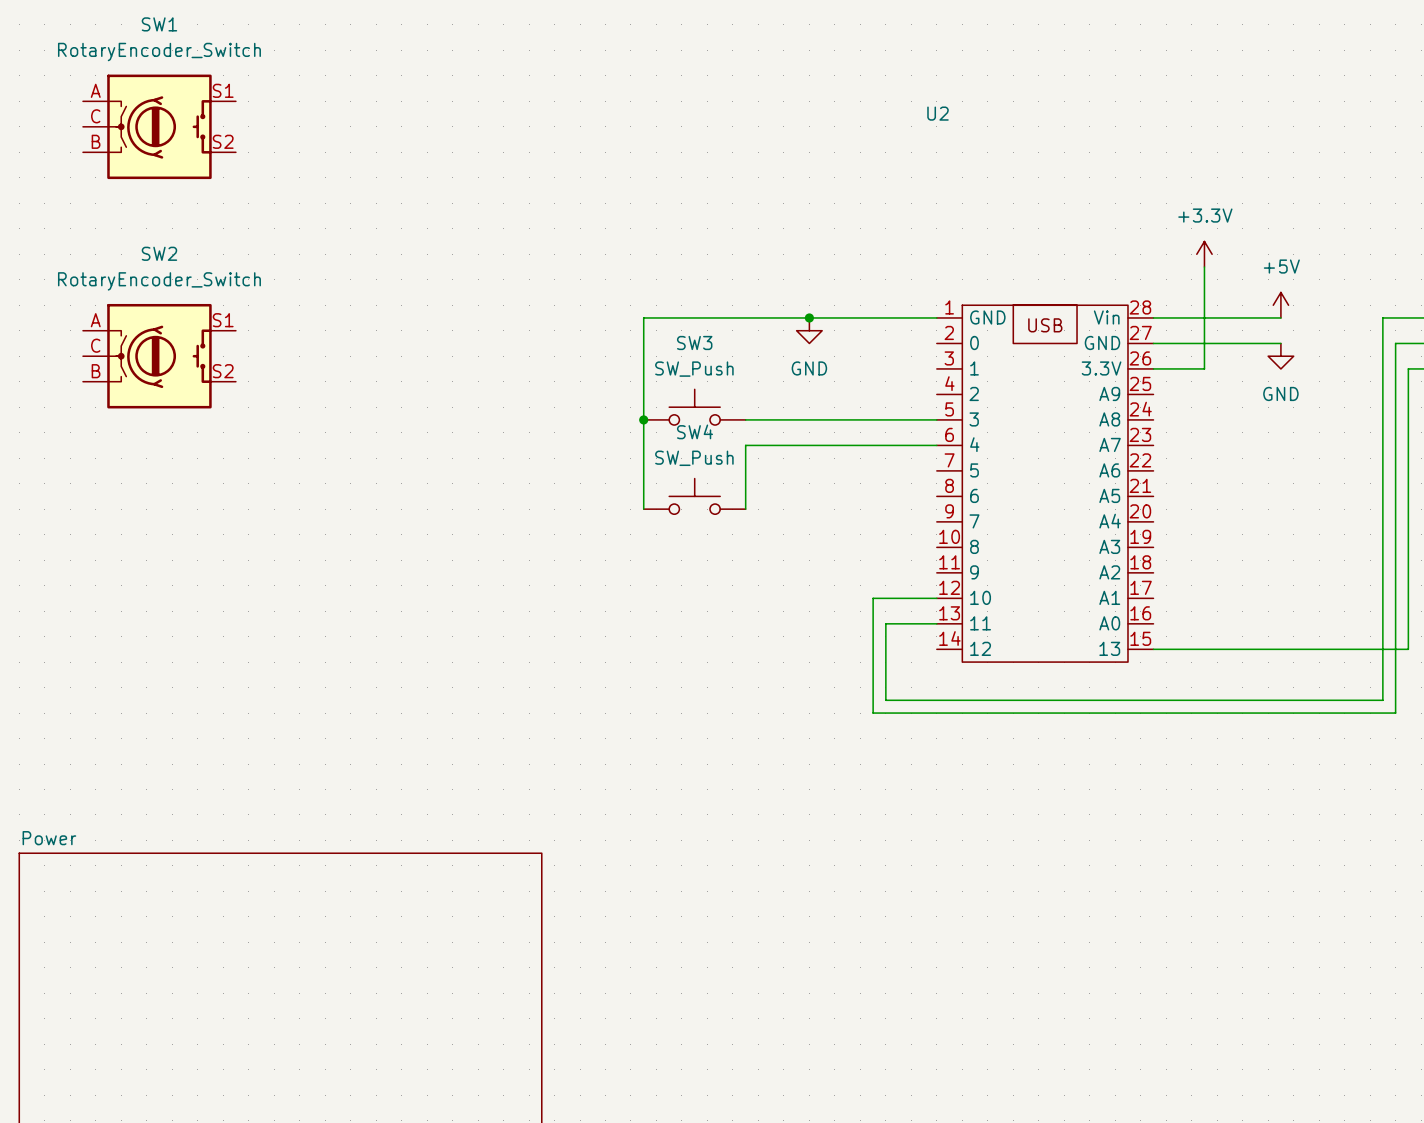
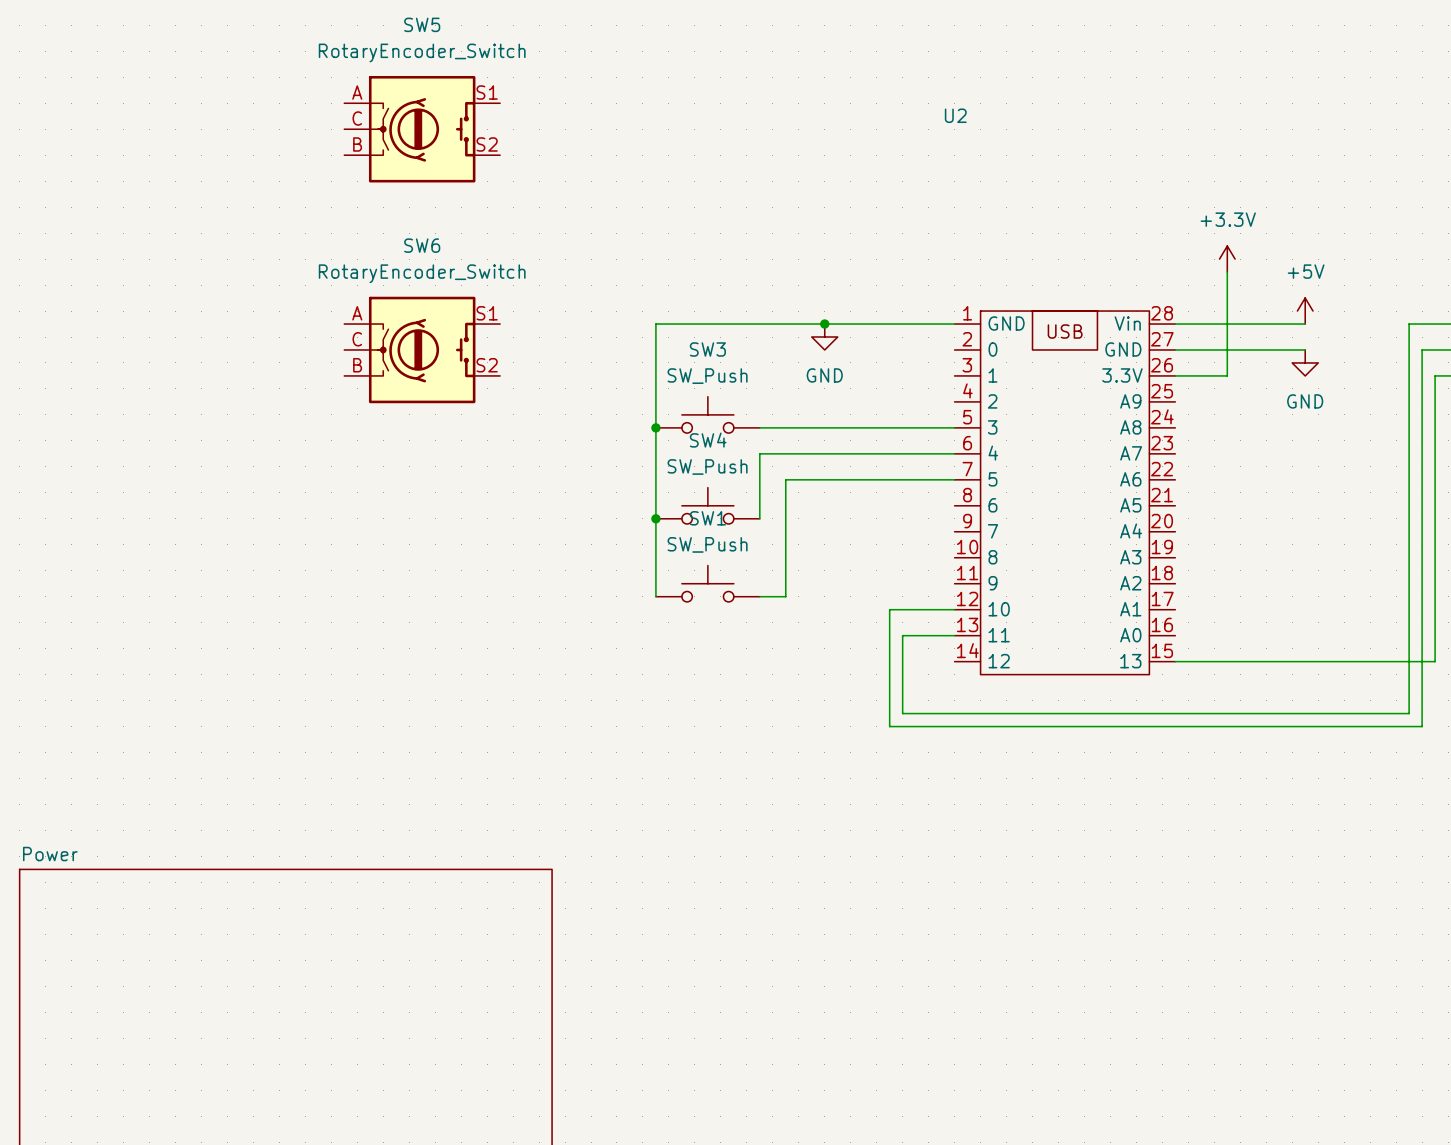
SW1 name position: SW1 (159, 24) -> SW1 (707, 518)
SW1 value: RotaryEncoder_Switch (159, 52) -> SW_Push (707, 544)
SW1 symbol: [82, 74, 236, 180] -> [655, 565, 760, 602]
SW5: none -> RotaryEncoder_Switch (422, 129)
SW6: none -> RotaryEncoder_Switch (422, 349)
SW2: RotaryEncoder_Switch (159, 356) -> none
wire: none -> (954, 479) (785, 479) (785, 596) (759, 596)
wire: none -> (655, 518) (655, 596)
junction: none -> (655, 518)

